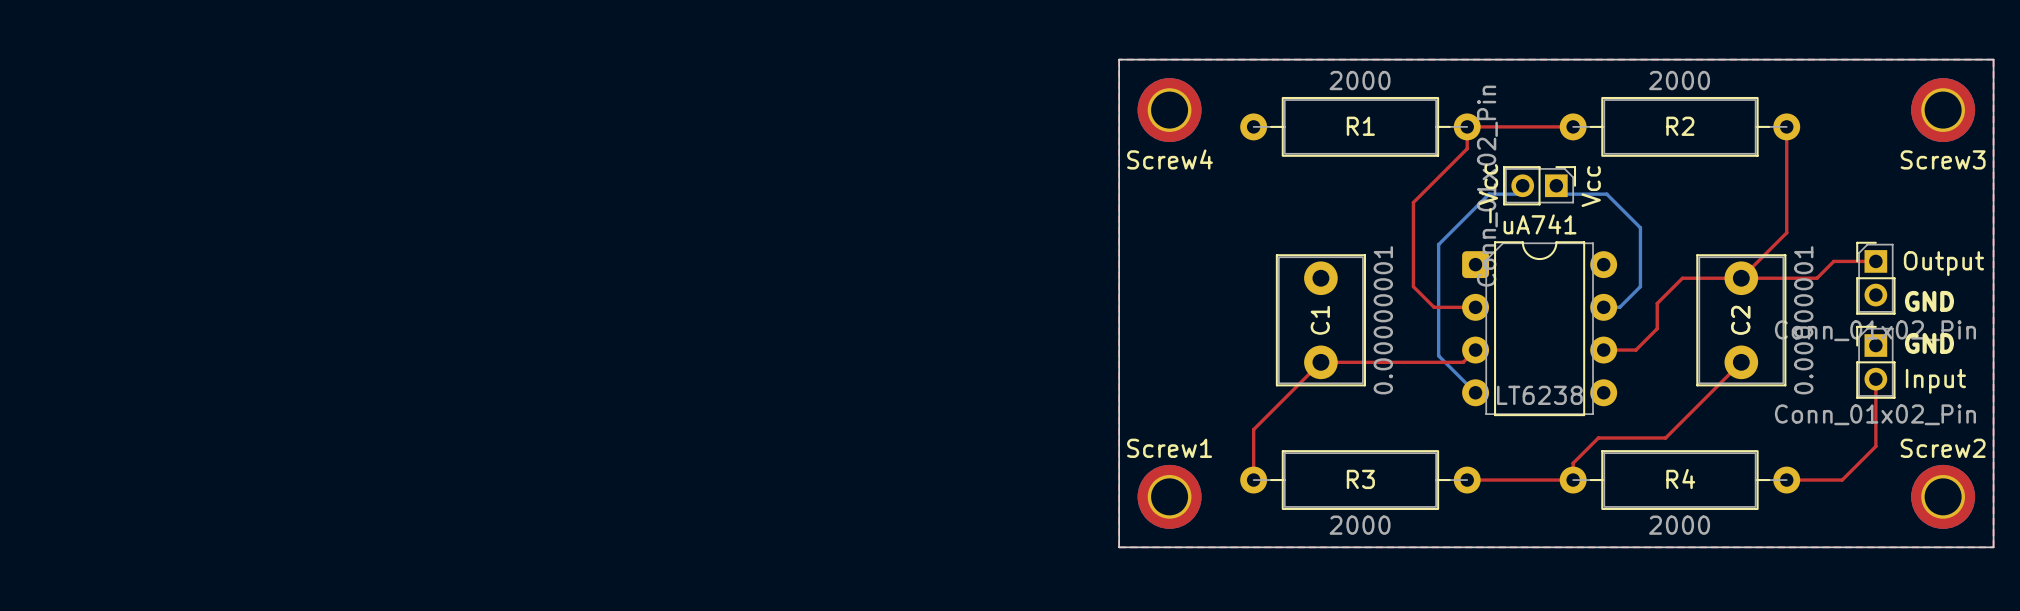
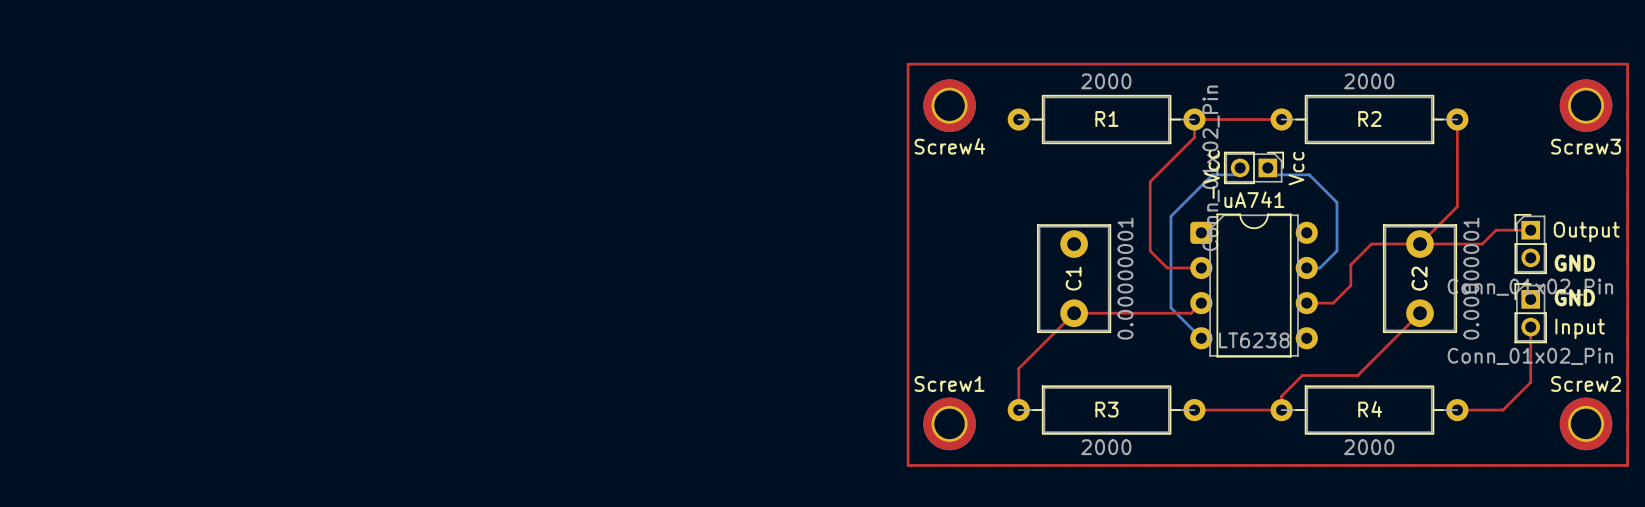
board edge: (1119, 59) (1993, 59) (1993, 547) (1119, 547) (1119, 59) -> none
top track: none -> (908, 64) (1627, 64) (1627, 465) (908, 465) (908, 64)

